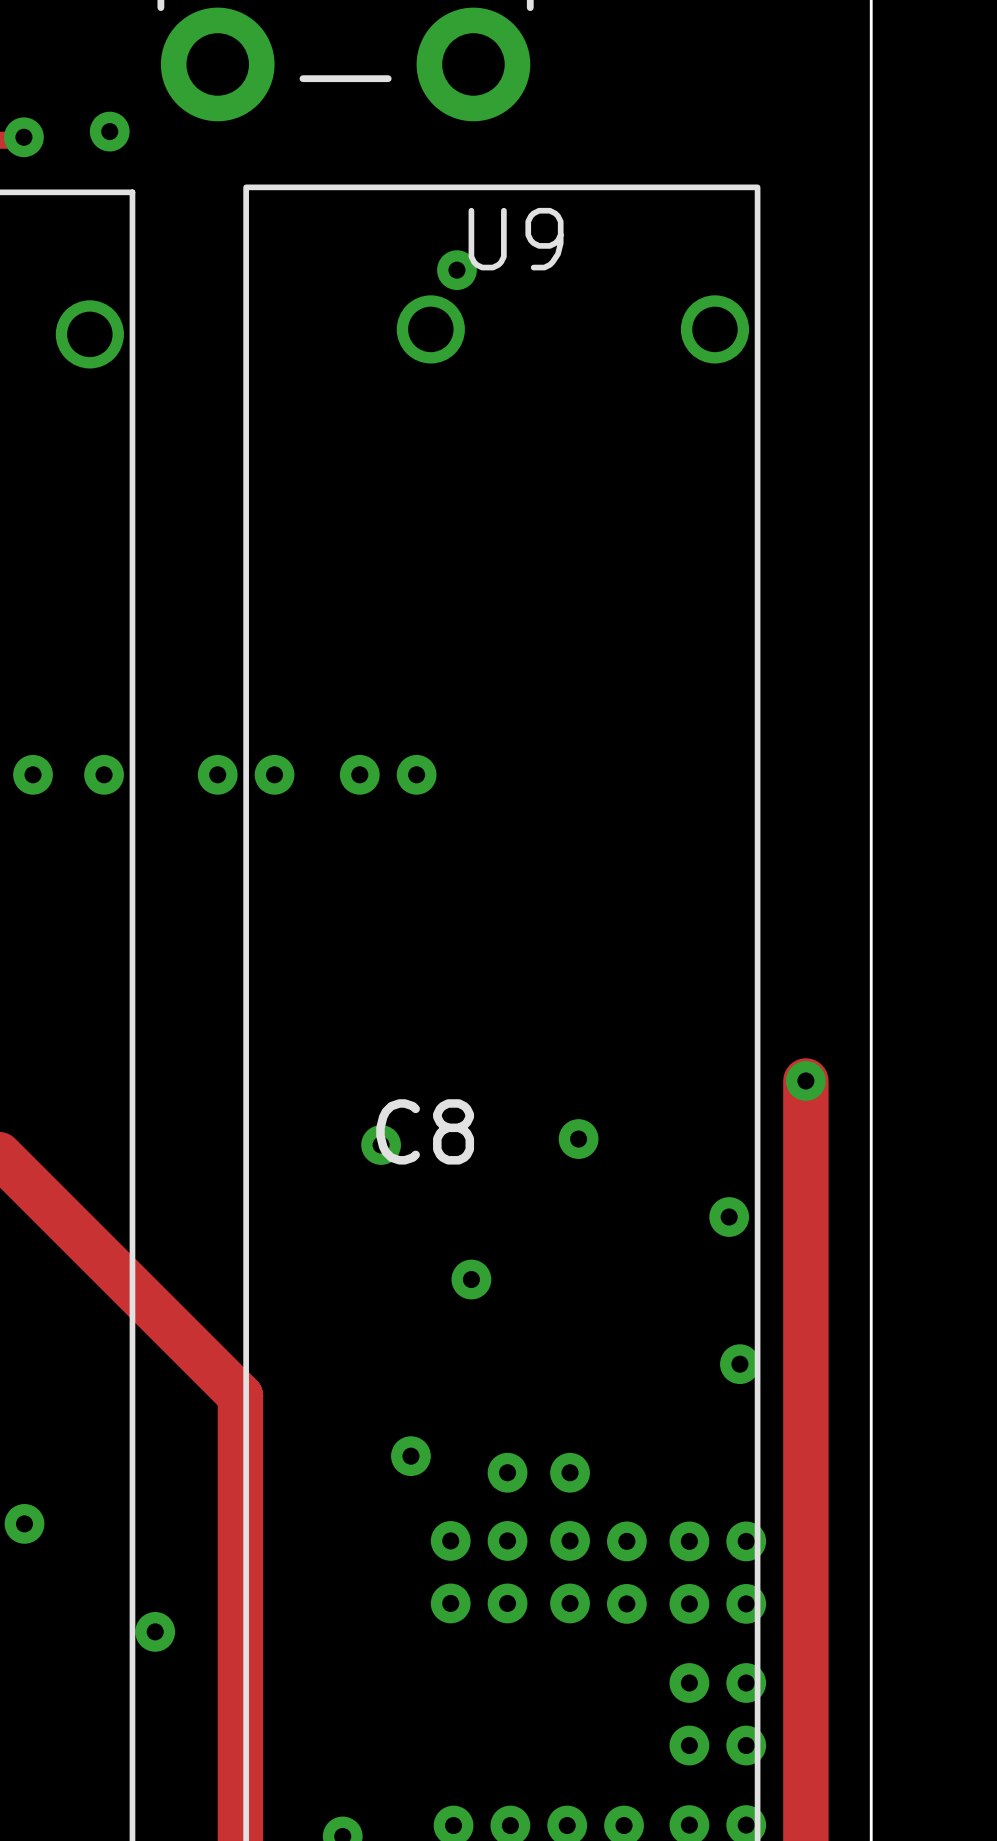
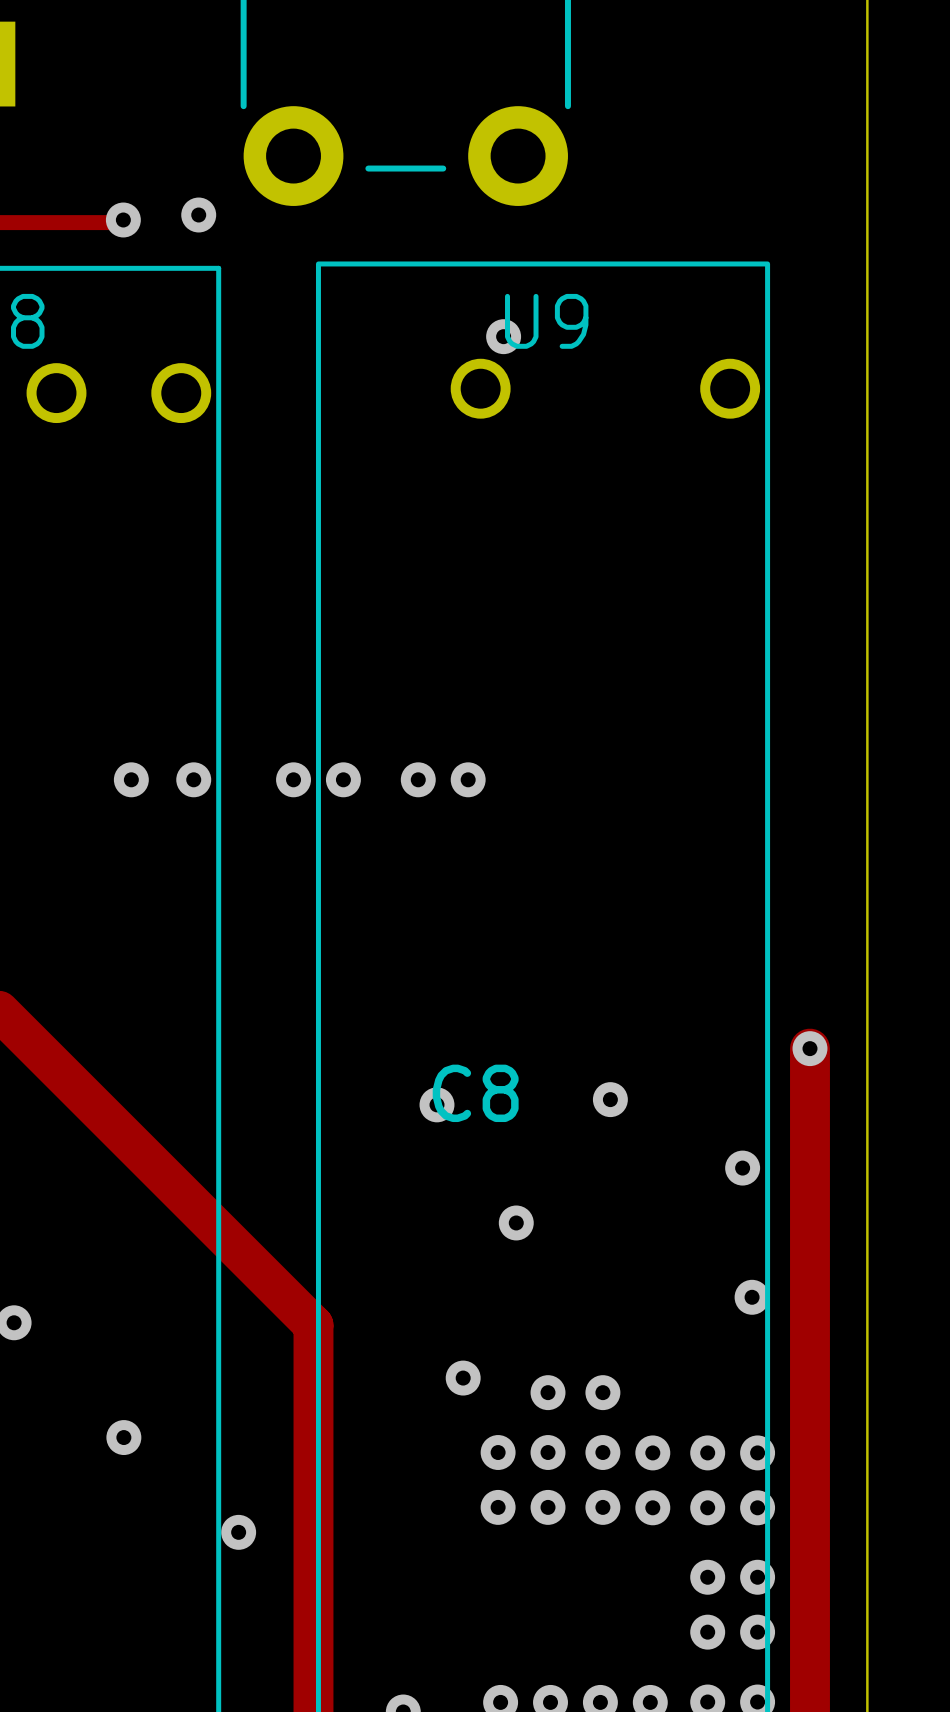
U9 name position: U9 (516, 239) -> U9 (546, 321)

